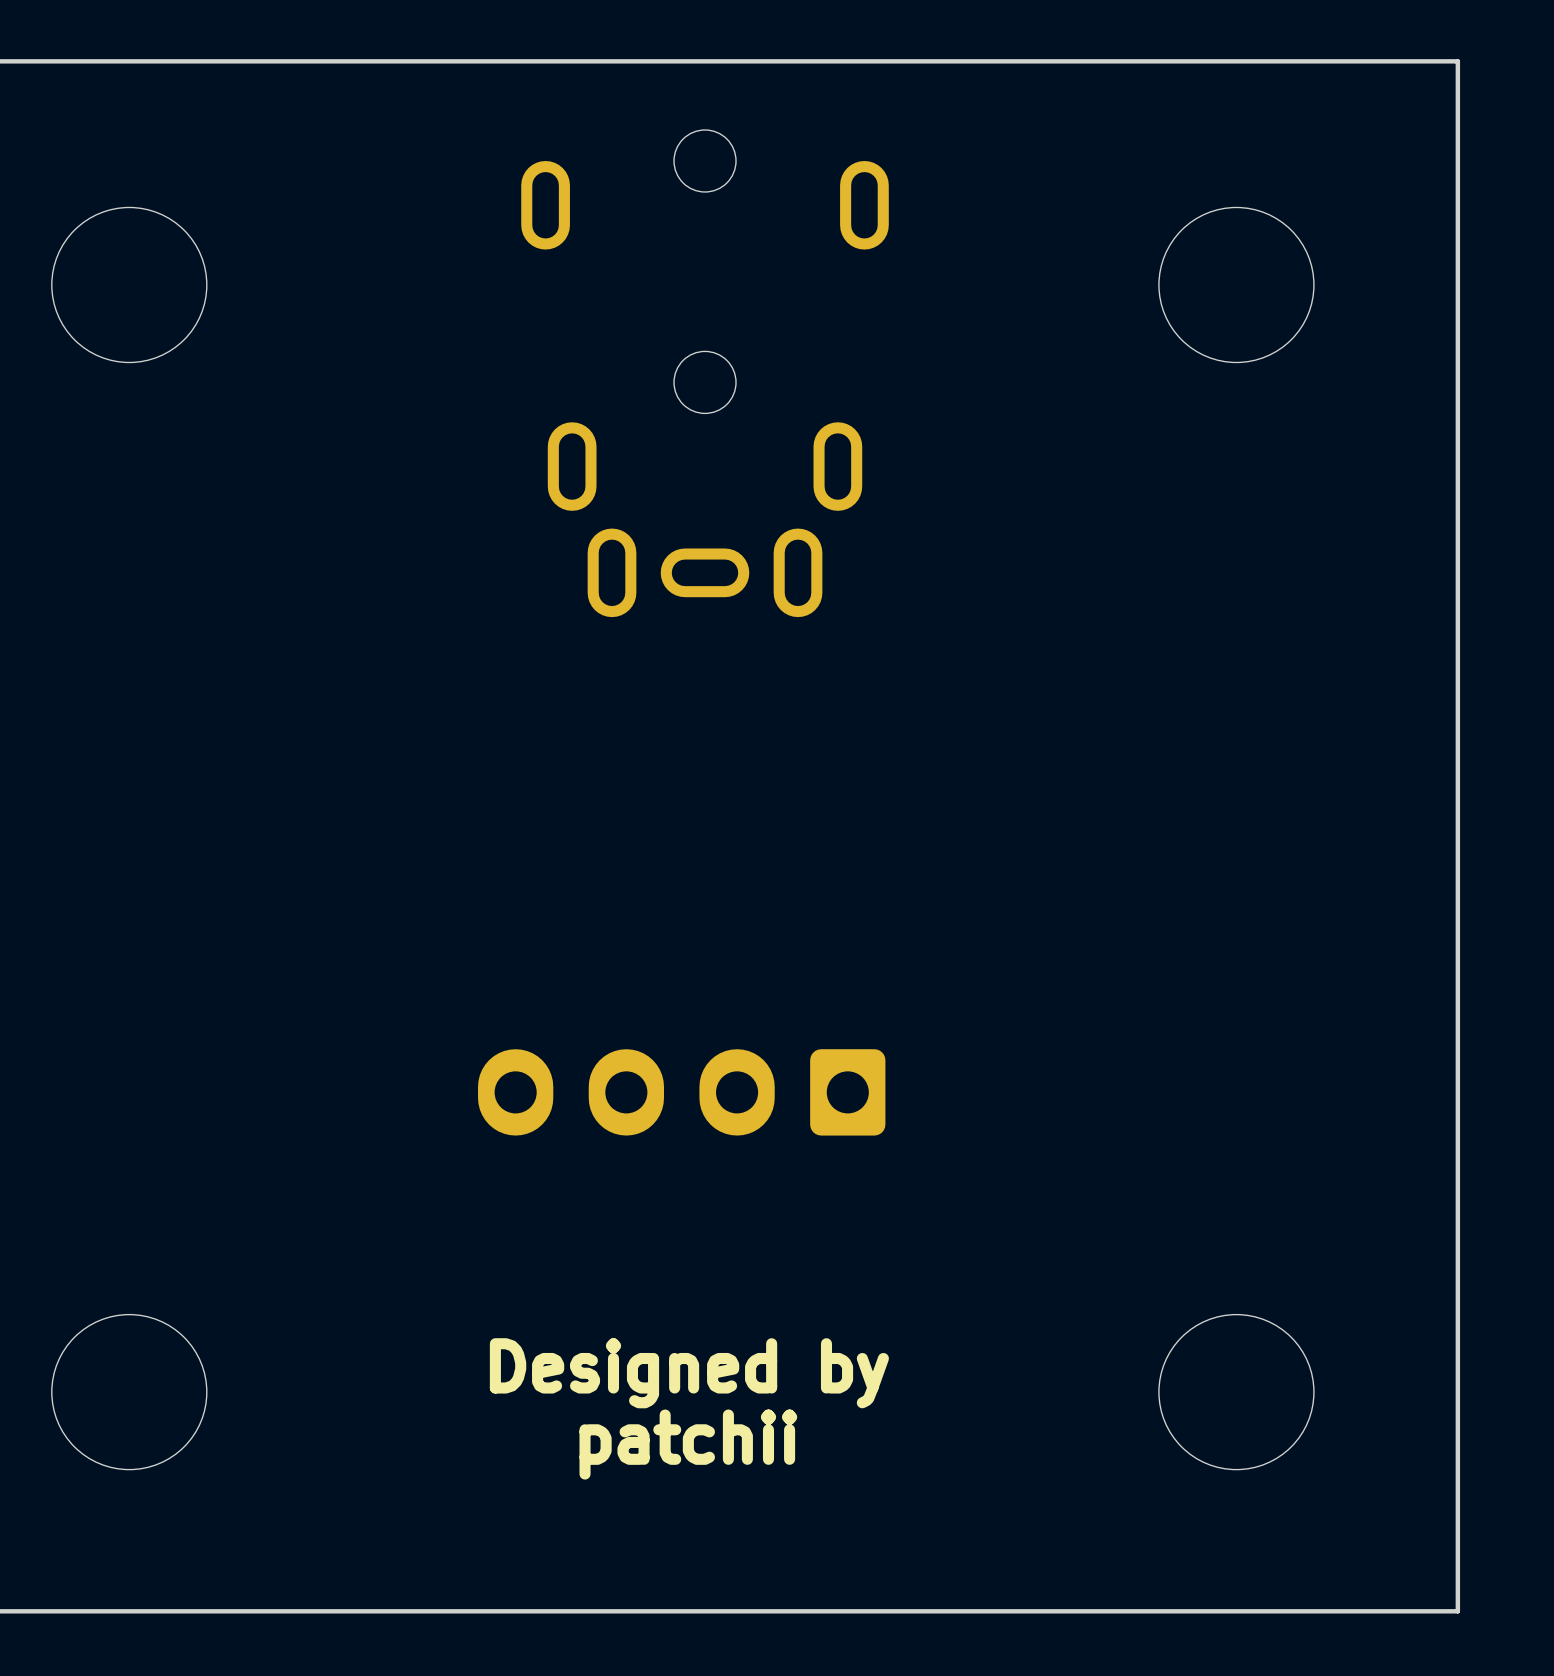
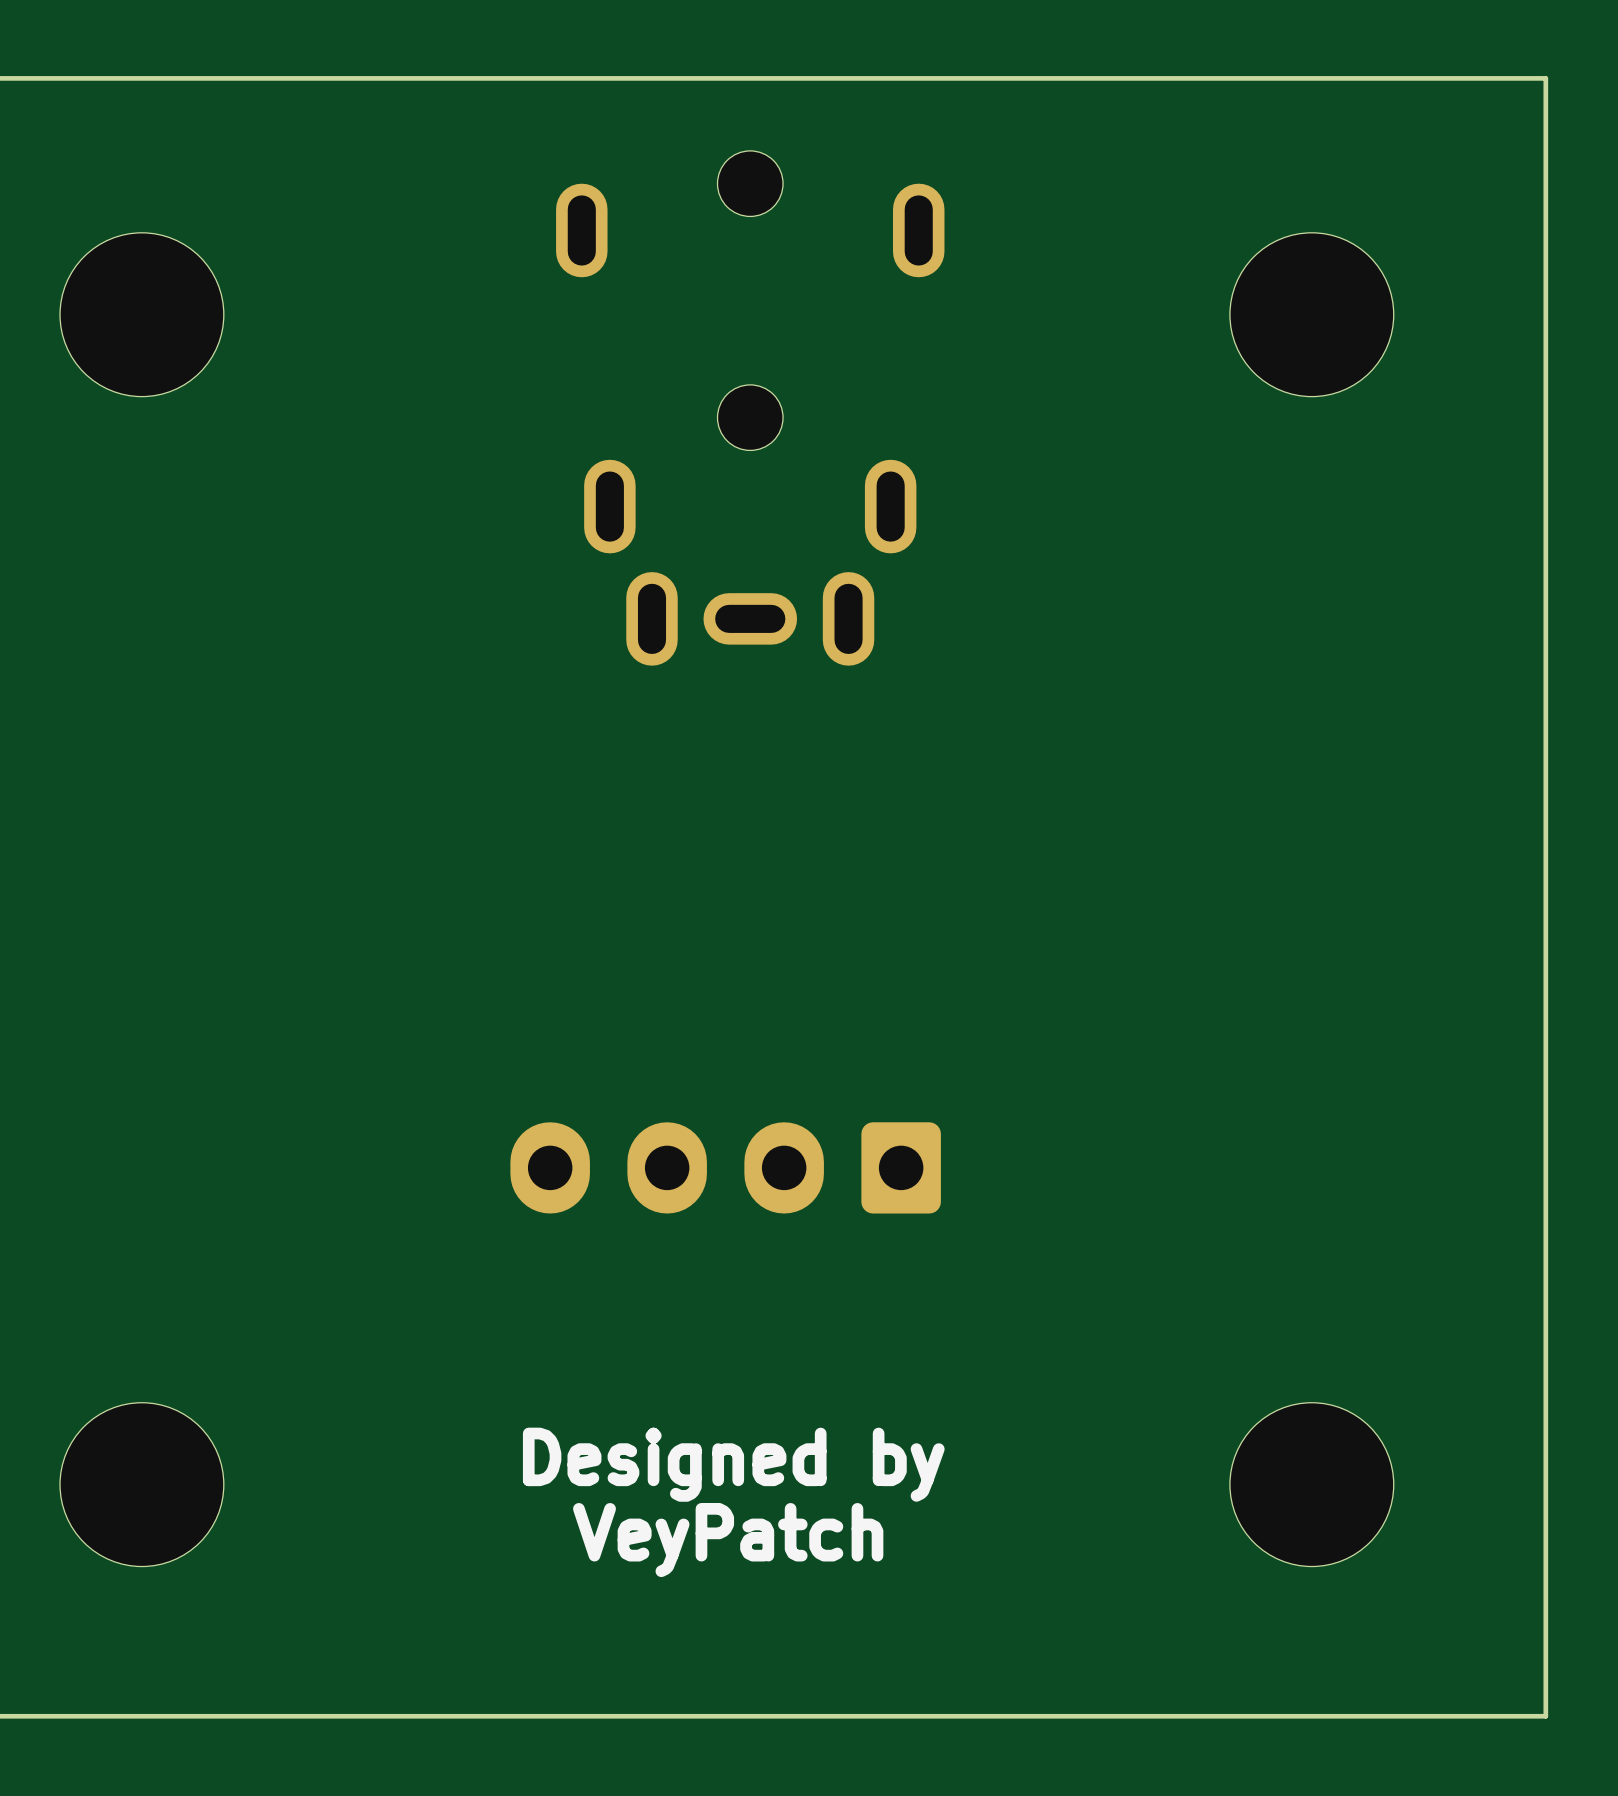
text: patchii (688, 1444) -> VeyPatch (728, 1540)

